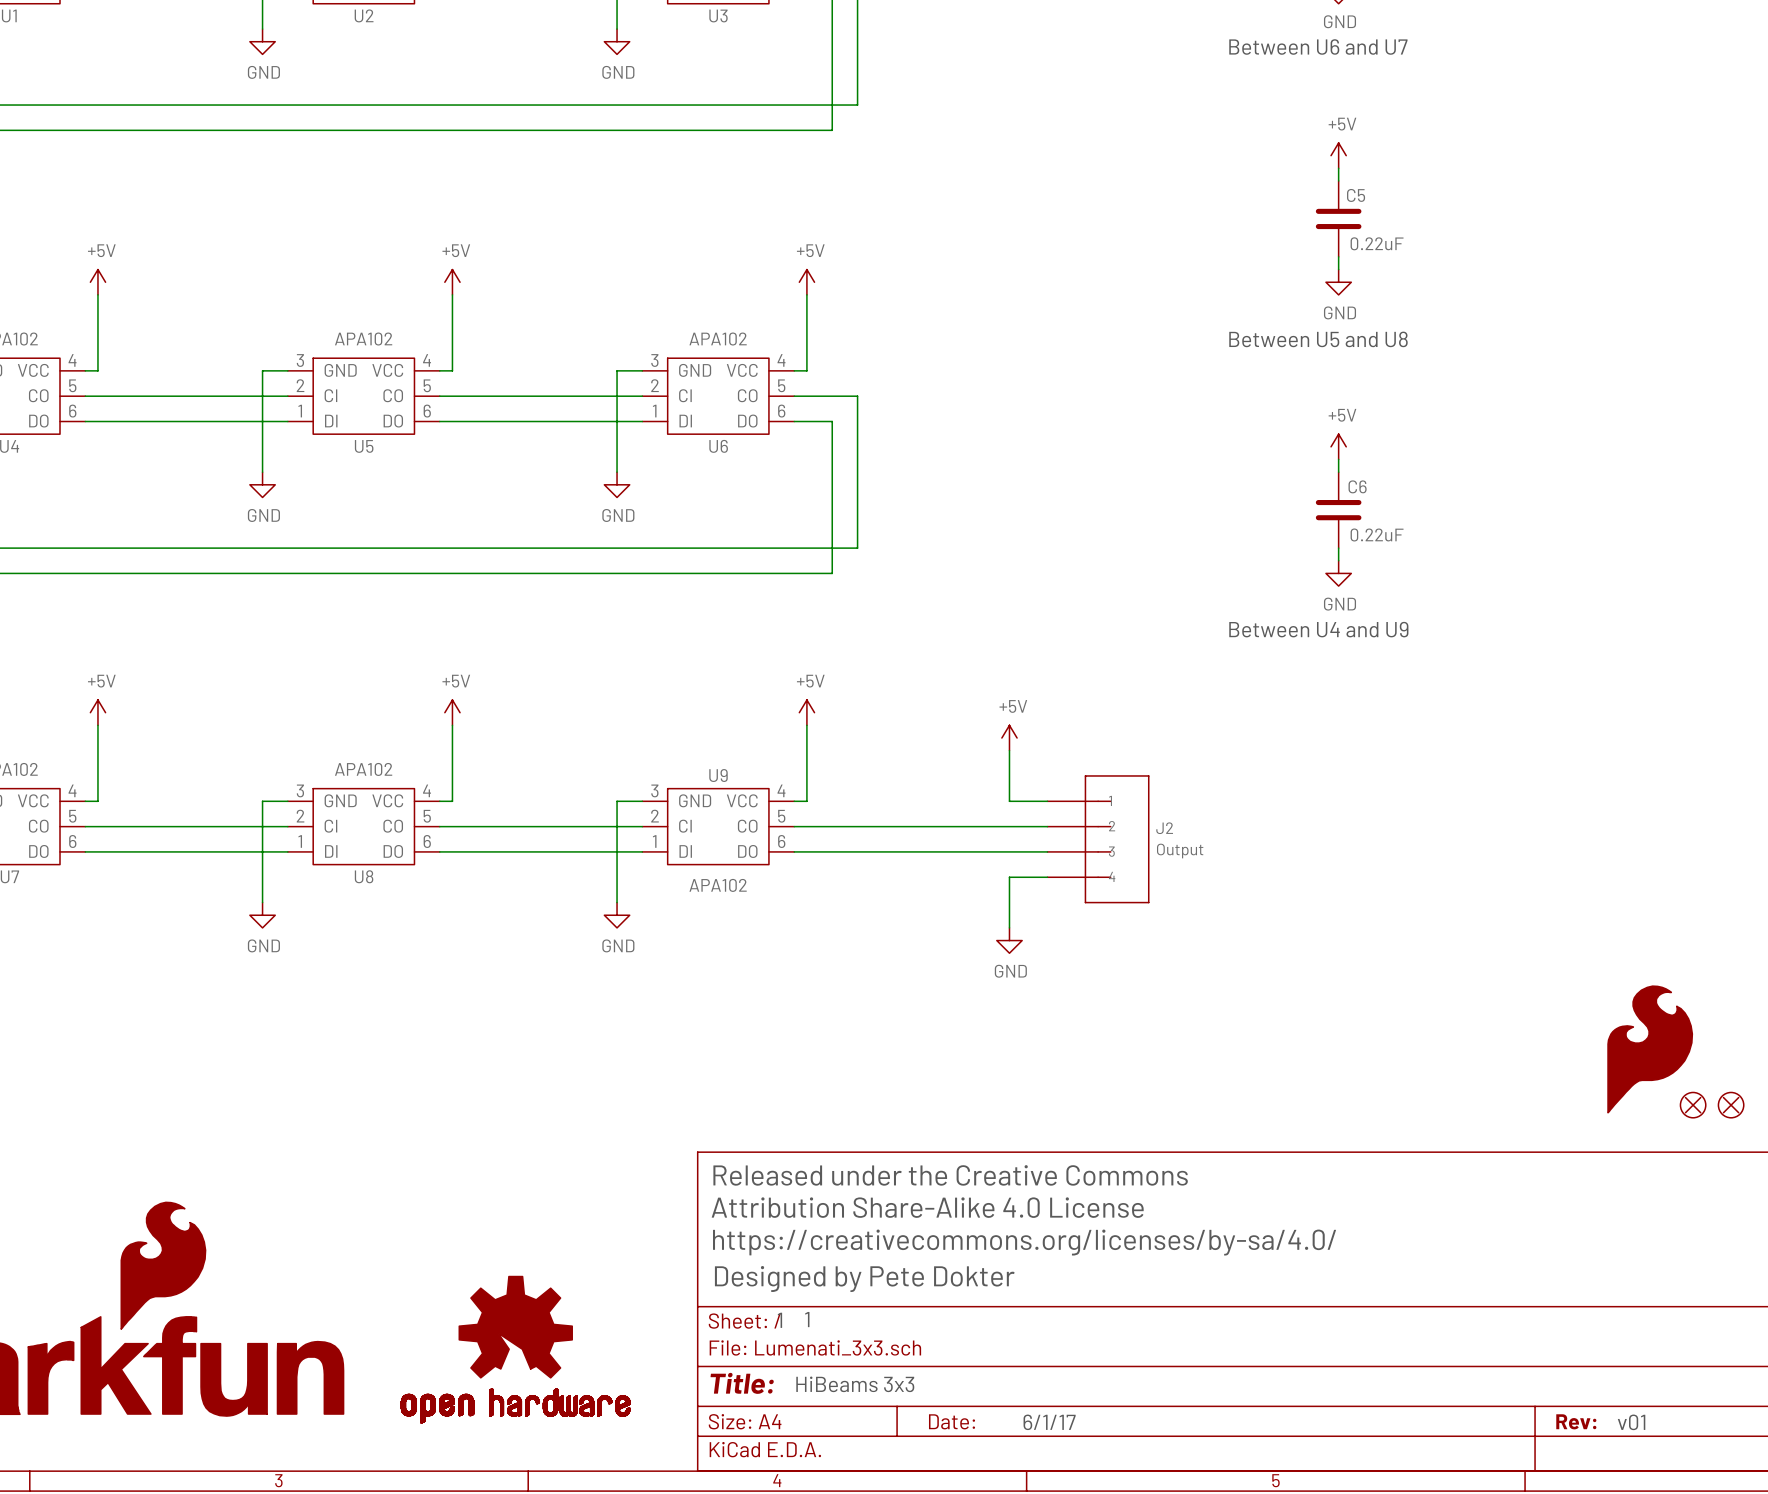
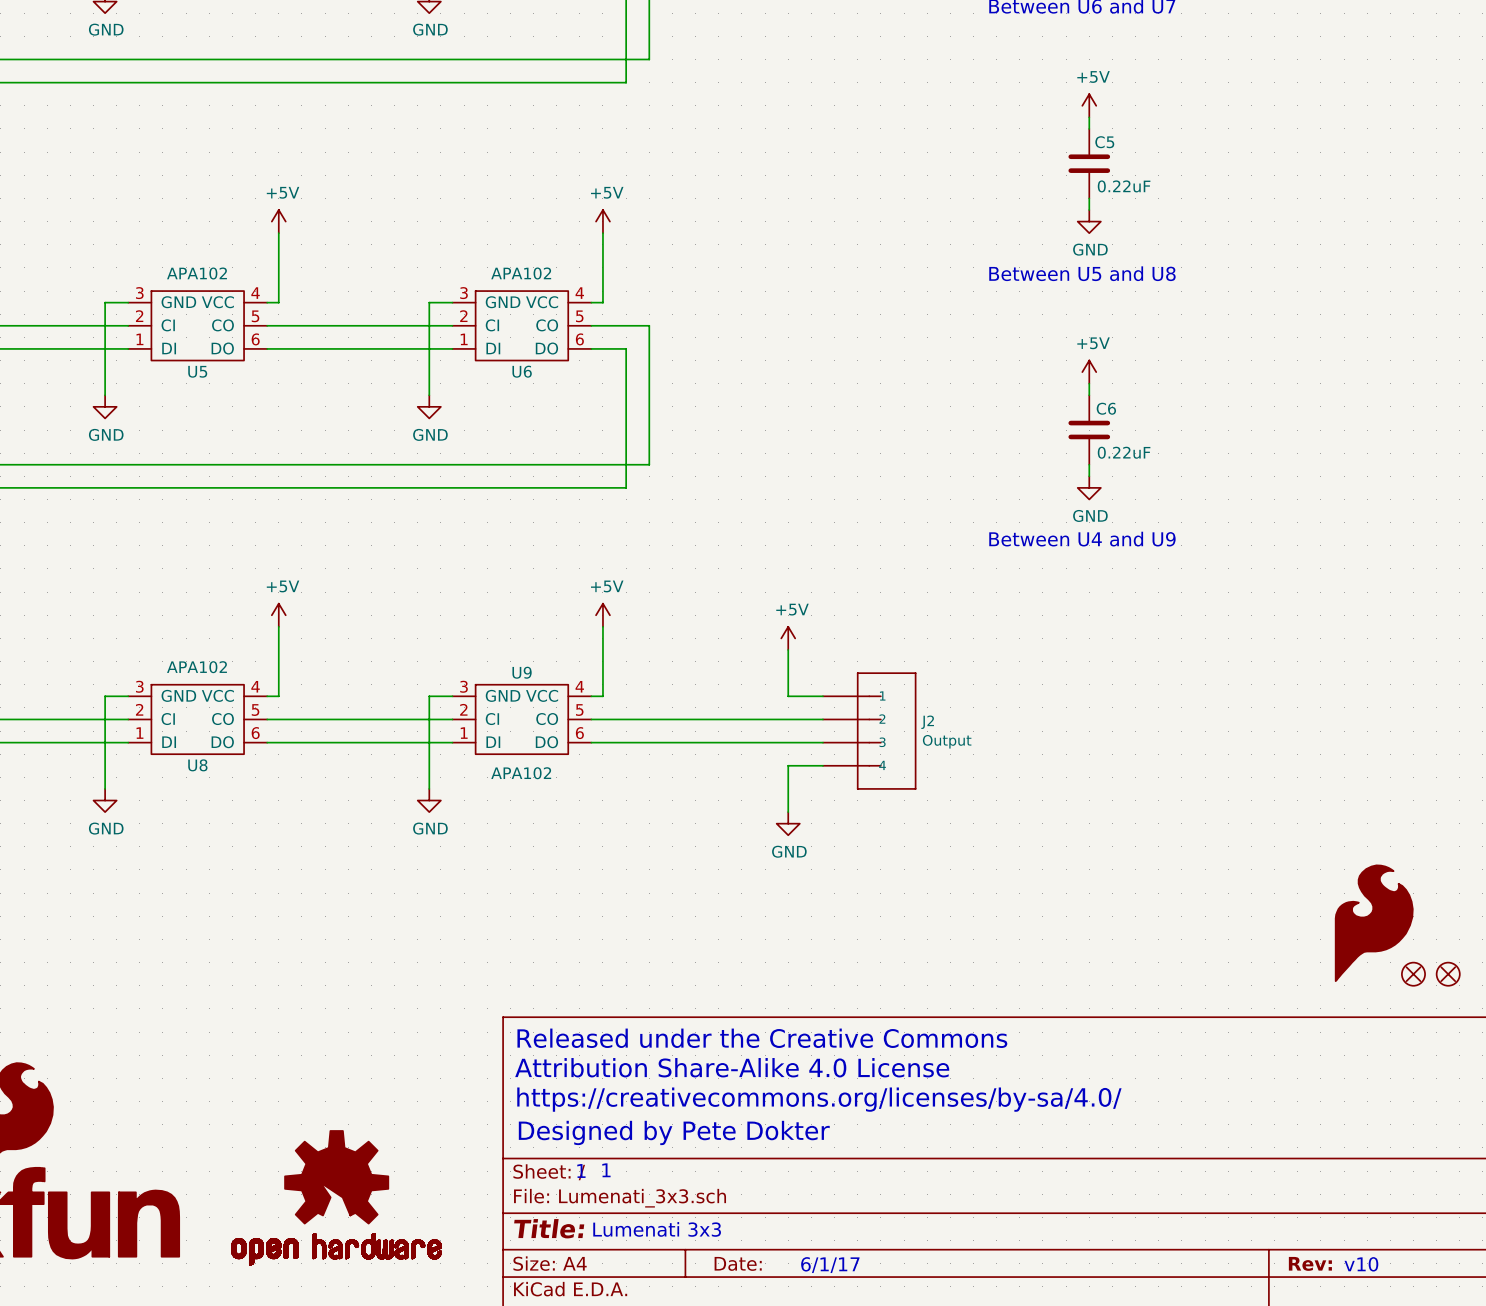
text: HiBeams 3x3 (855, 1384) -> Lumenati 3x3 (657, 1229)
text: v01 (1631, 1422) -> v10 (1361, 1264)

